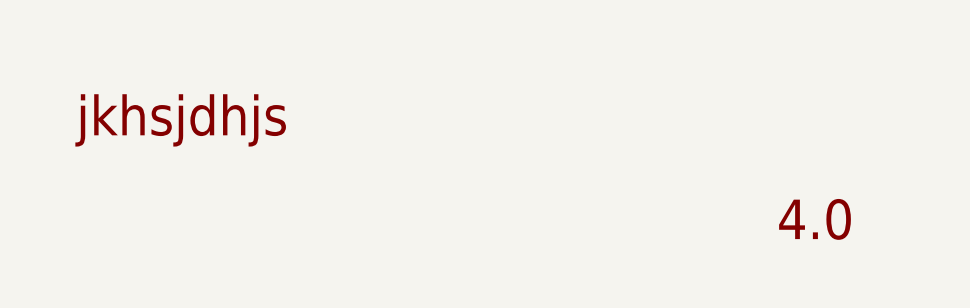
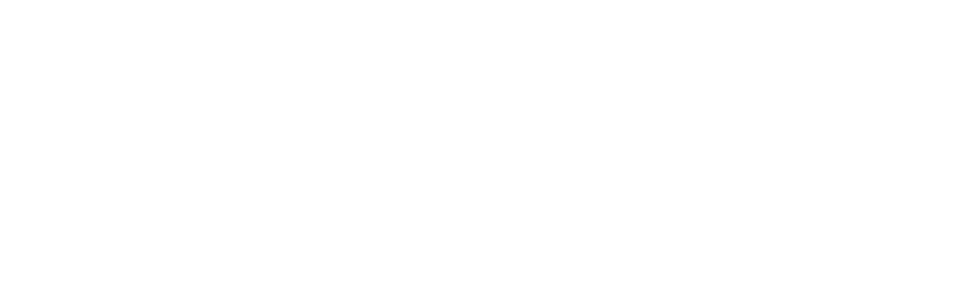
text: jkhsjdhjs (180, 120) -> none
text: 4.0 (815, 219) -> none

